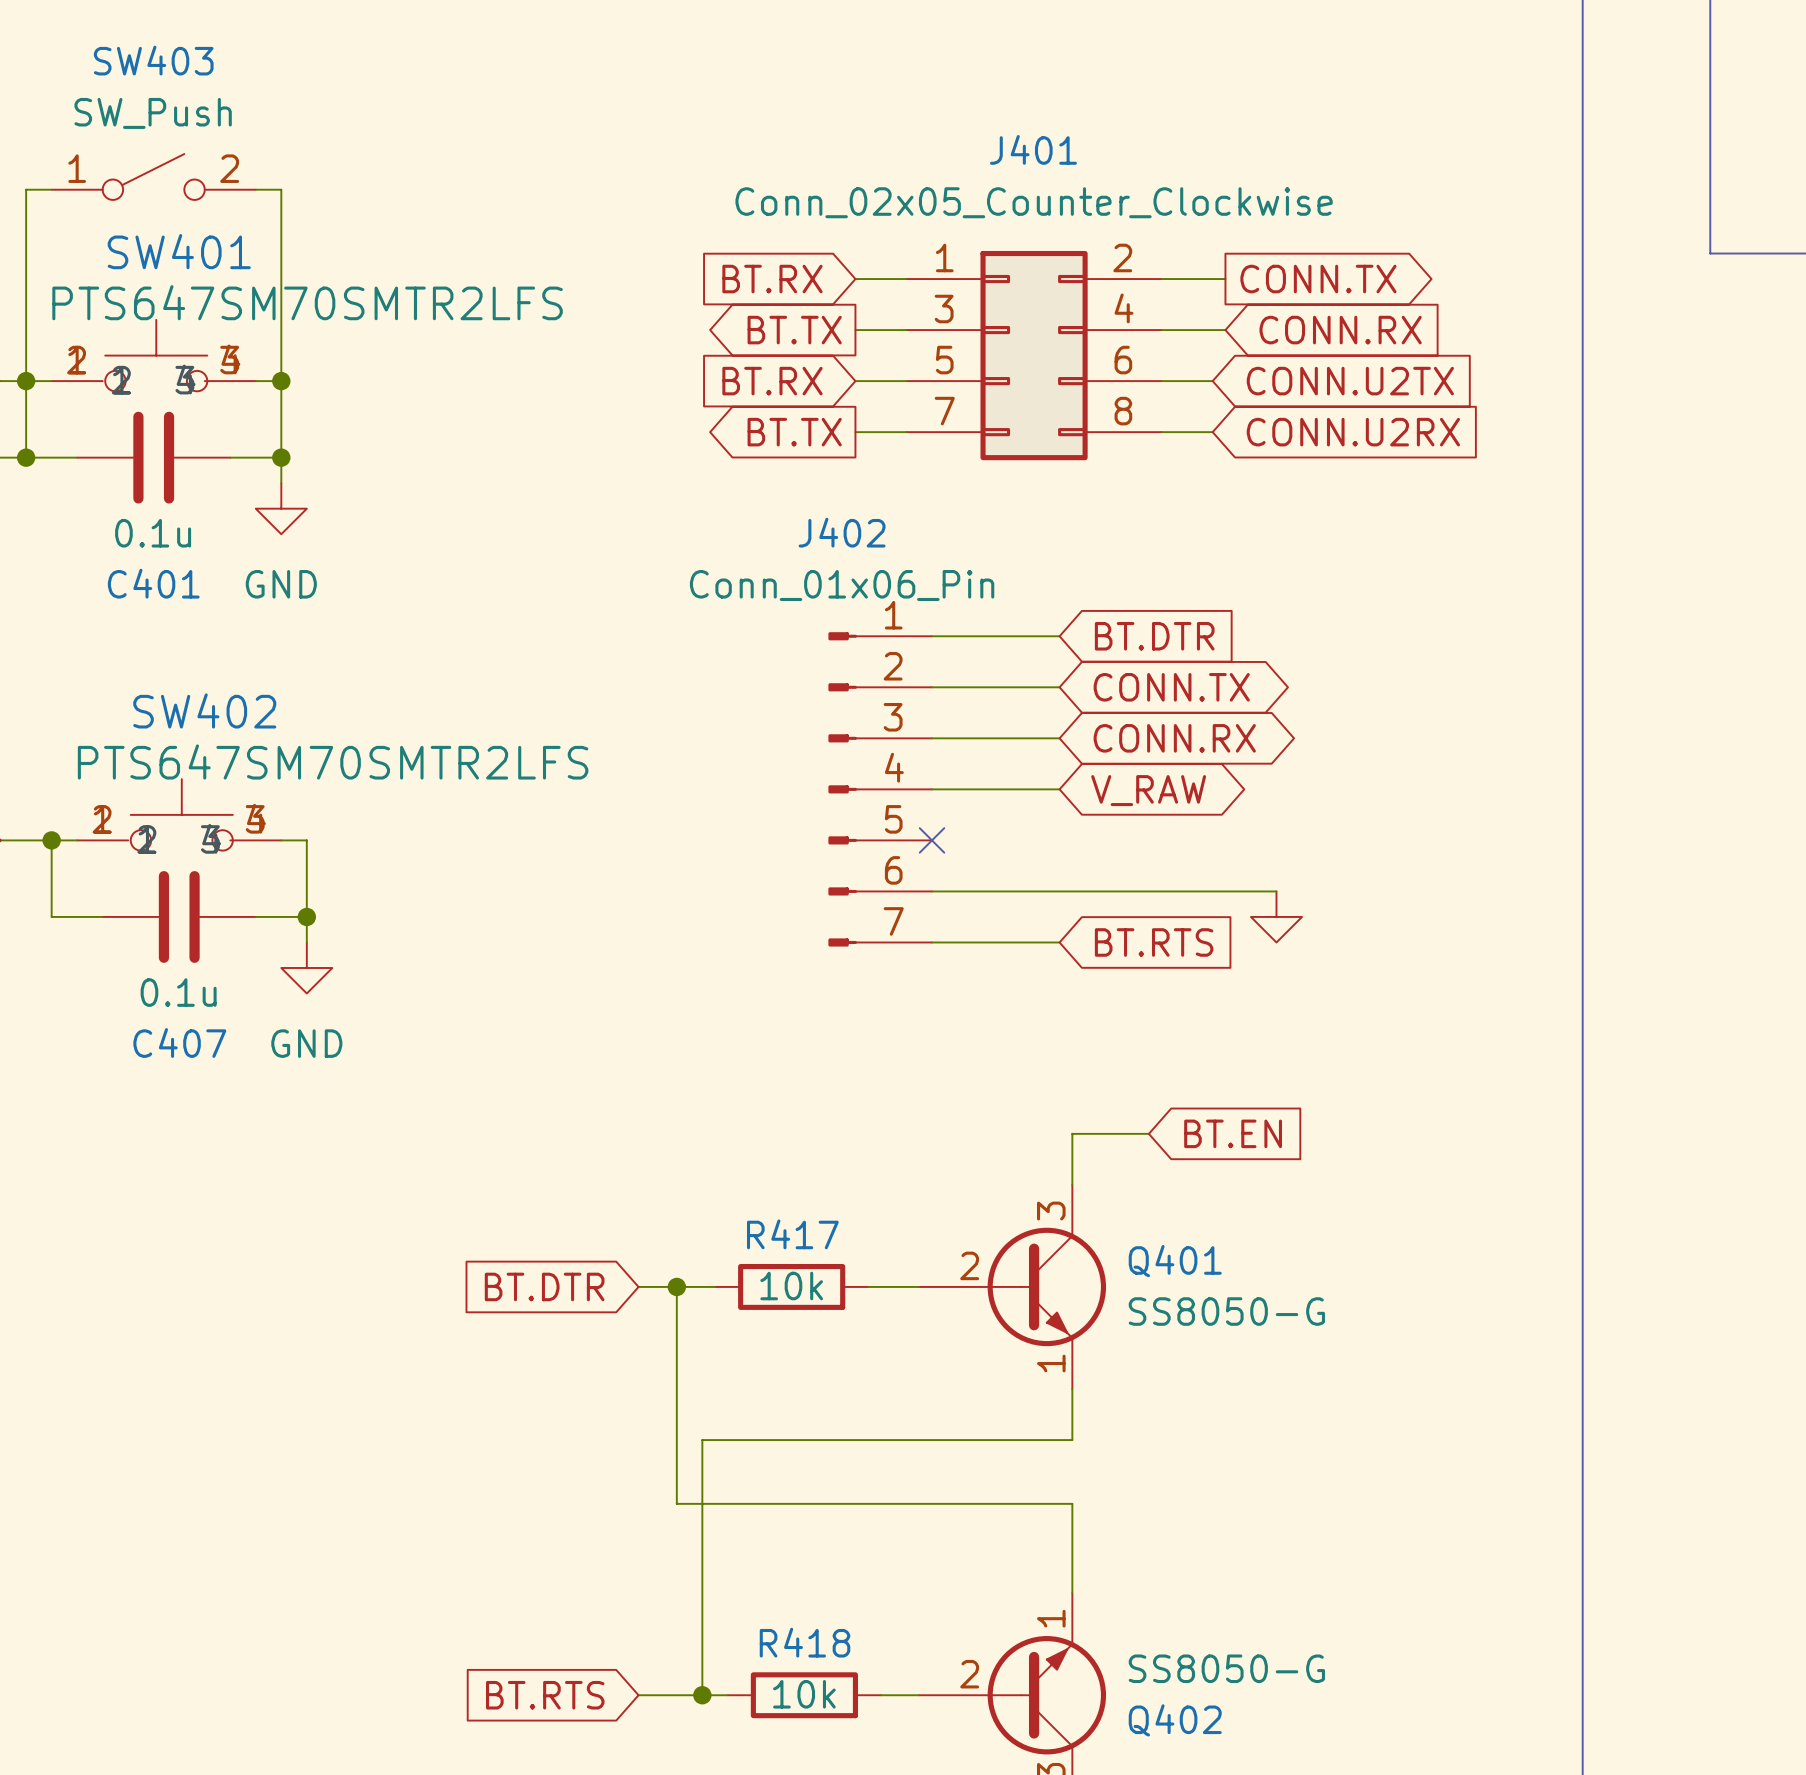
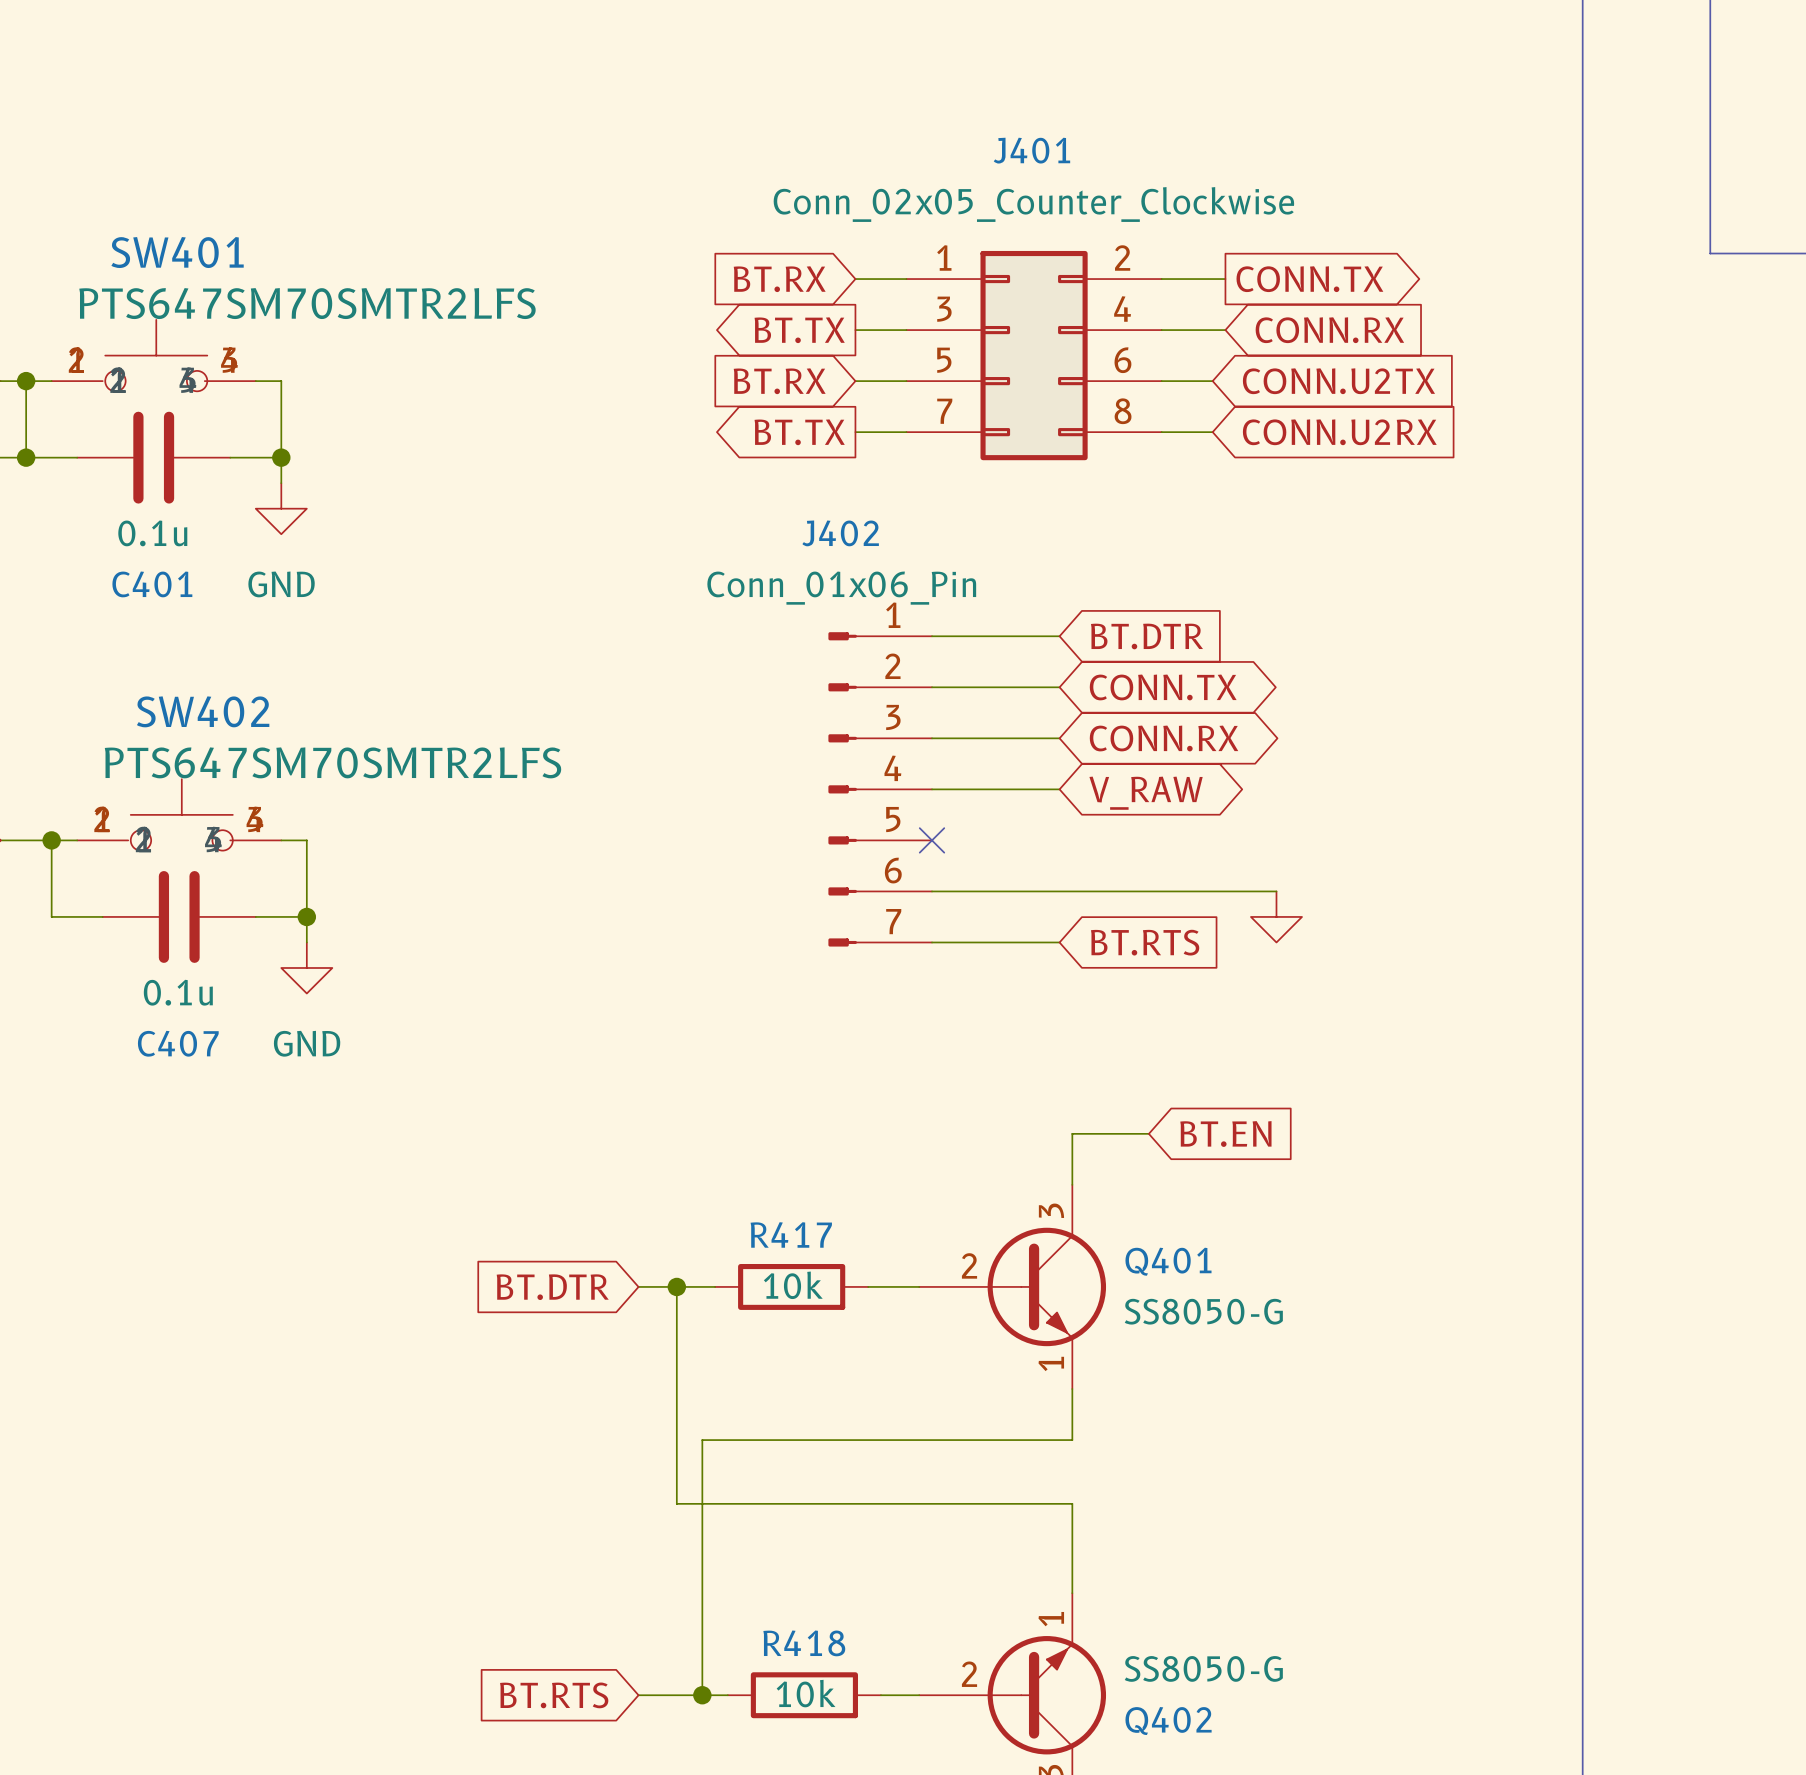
SW403: SW_Push (153, 176) -> none
wire: (51, 189) (26, 189) (26, 381) -> none
wire: (255, 189) (281, 189) (281, 381) -> none
junction: (281, 381) -> none

